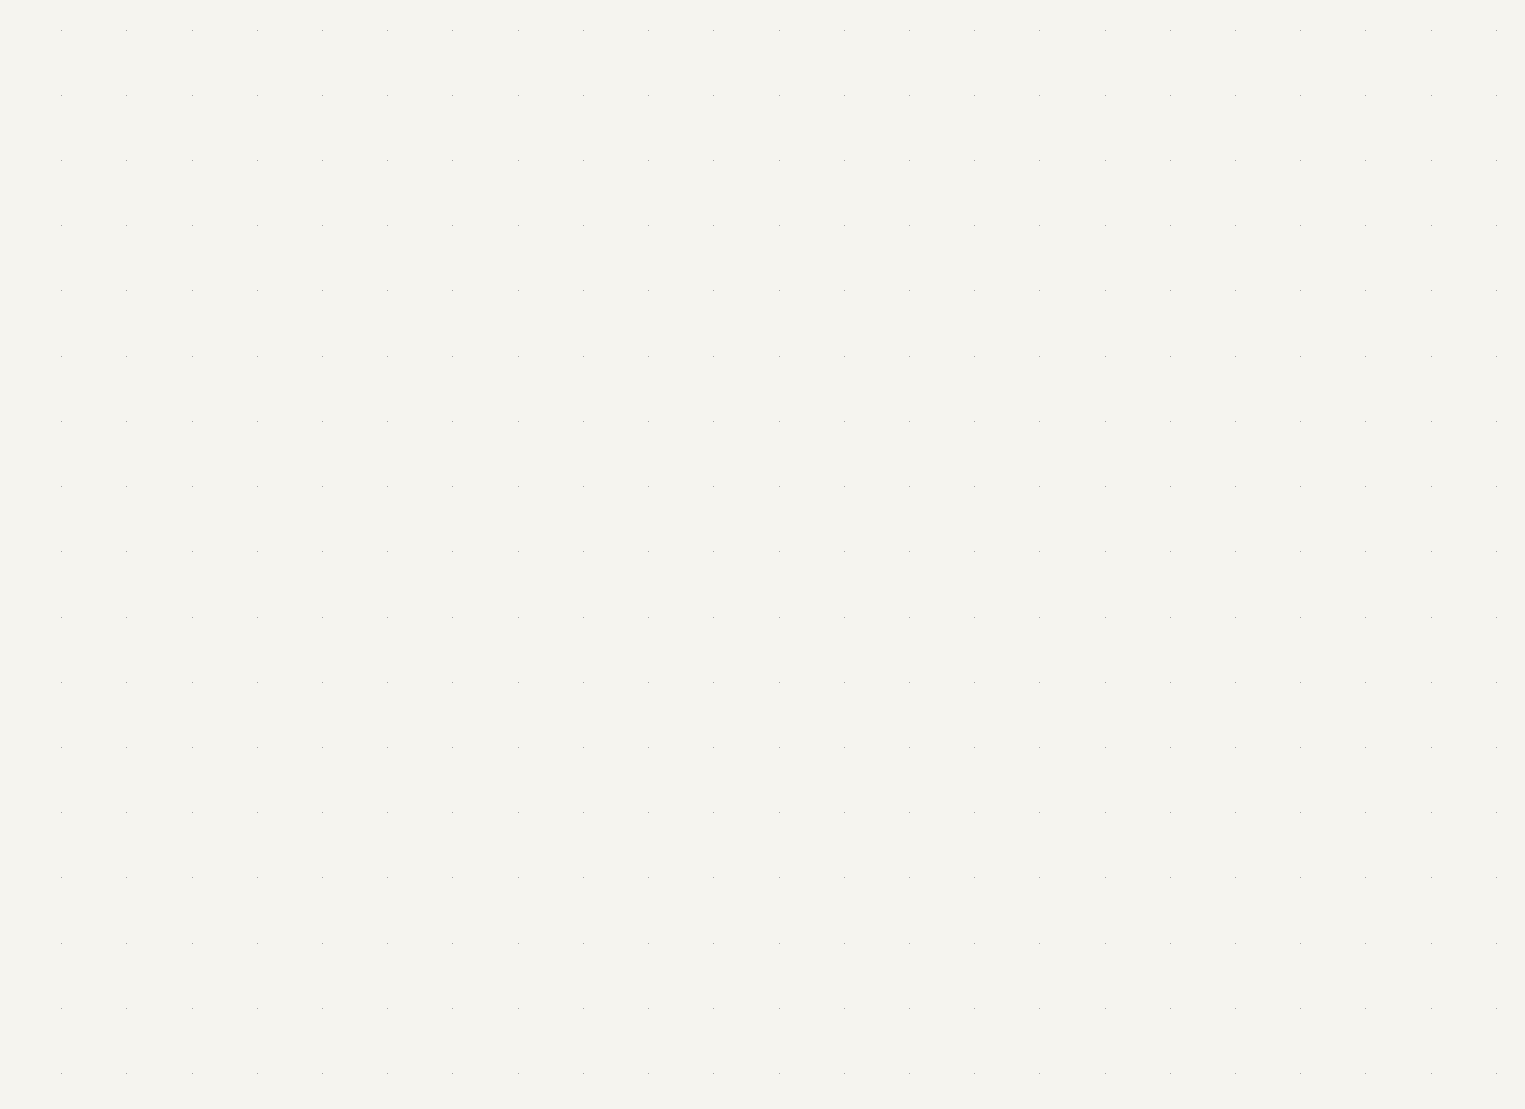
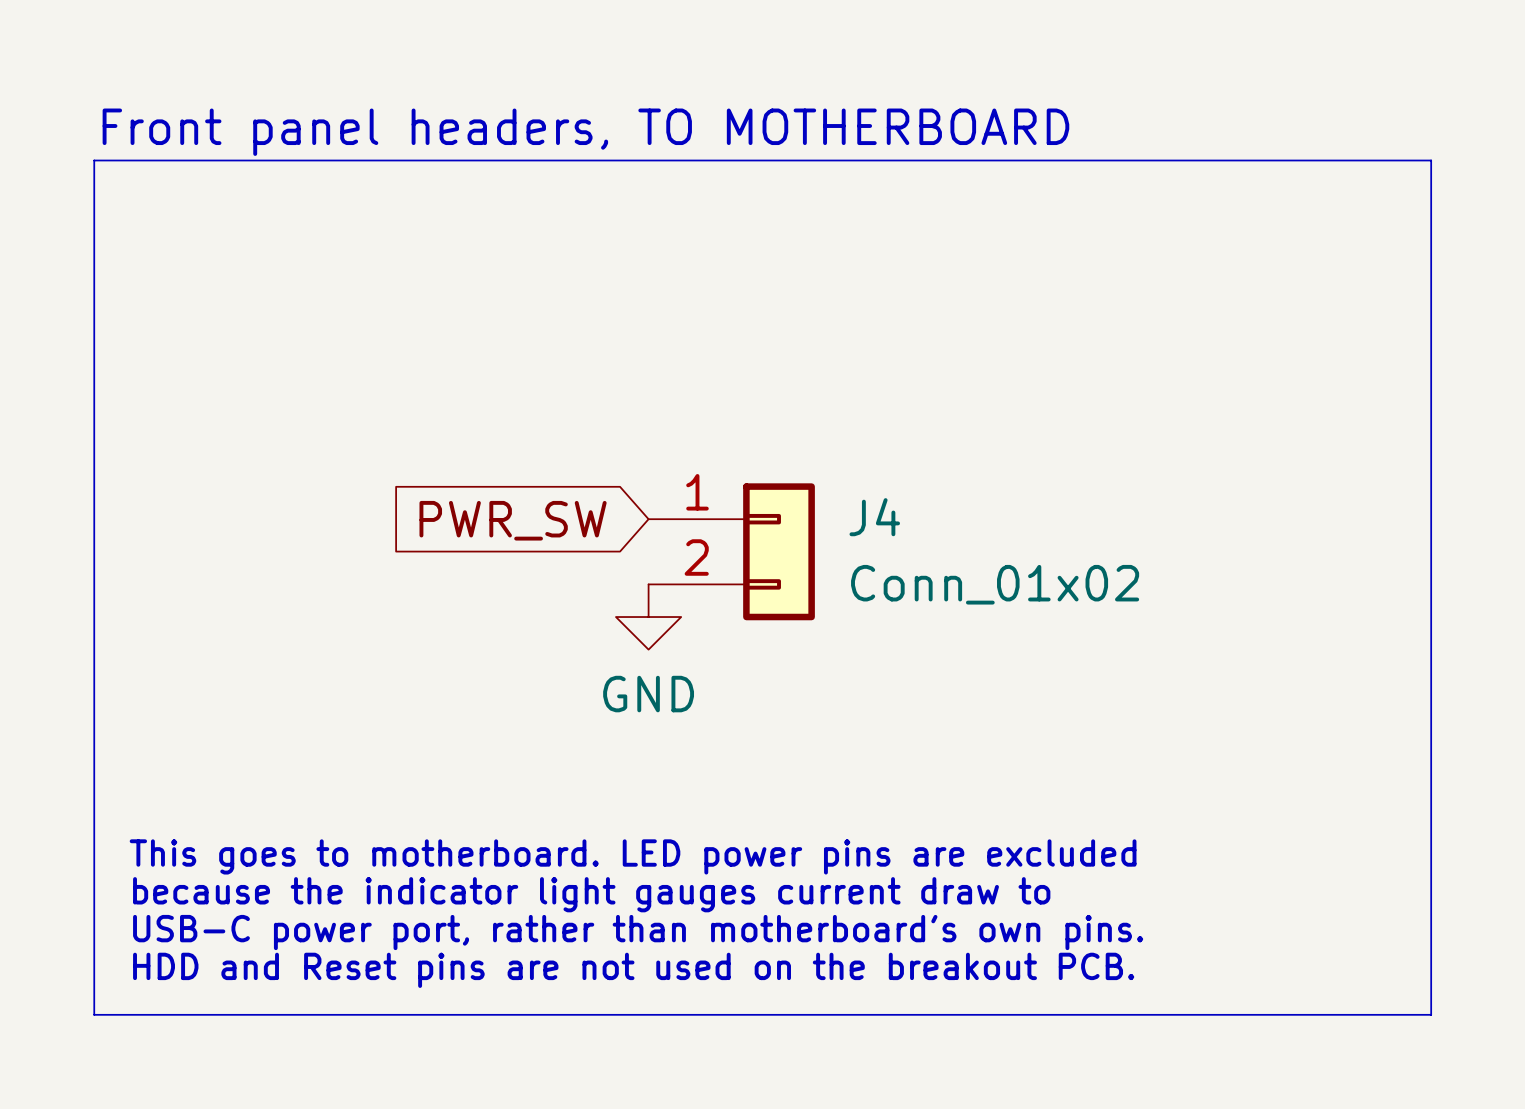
text: none -> Front panel headers, TO MOTHERBOARD (585, 132)
line: none -> (94, 160) (1431, 160) (1431, 1014) (94, 1014) (94, 160)
global label: none -> PWR_SW (513, 520)
J4: none -> Conn_01x02 (731, 551)
power symbol: none -> GND (648, 617)
text: none -> This goes to motherboard. LED power pins are excluded (633, 856)
text: none -> because the indicator light gauges current draw to (591, 894)
text: none -> USB-C power port, rather than motherboard's own pins. (638, 932)
text: none -> HDD and Reset pins are not used on the breakout PCB. (633, 970)

